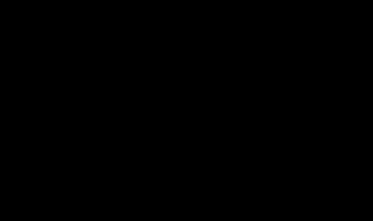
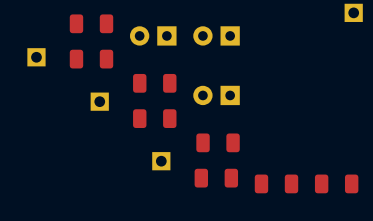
part: none -> (353, 12)
part: none -> (91, 23)
part: none -> (153, 35)
part: none -> (216, 35)
part: none -> (36, 57)
part: none -> (91, 59)
part: none -> (154, 83)
part: none -> (216, 95)
part: none -> (99, 101)
part: none -> (154, 118)
part: none -> (218, 142)
part: none -> (161, 161)
part: none -> (216, 178)
part: none -> (276, 183)
part: none -> (336, 183)

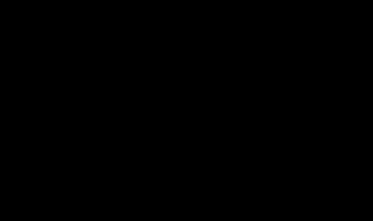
part: (353, 12) -> none
part: (91, 23) -> none
part: (153, 35) -> none
part: (216, 35) -> none
part: (36, 57) -> none
part: (91, 59) -> none
part: (154, 83) -> none
part: (216, 95) -> none
part: (99, 101) -> none
part: (154, 118) -> none
part: (218, 142) -> none
part: (161, 161) -> none
part: (216, 178) -> none
part: (276, 183) -> none
part: (336, 183) -> none

